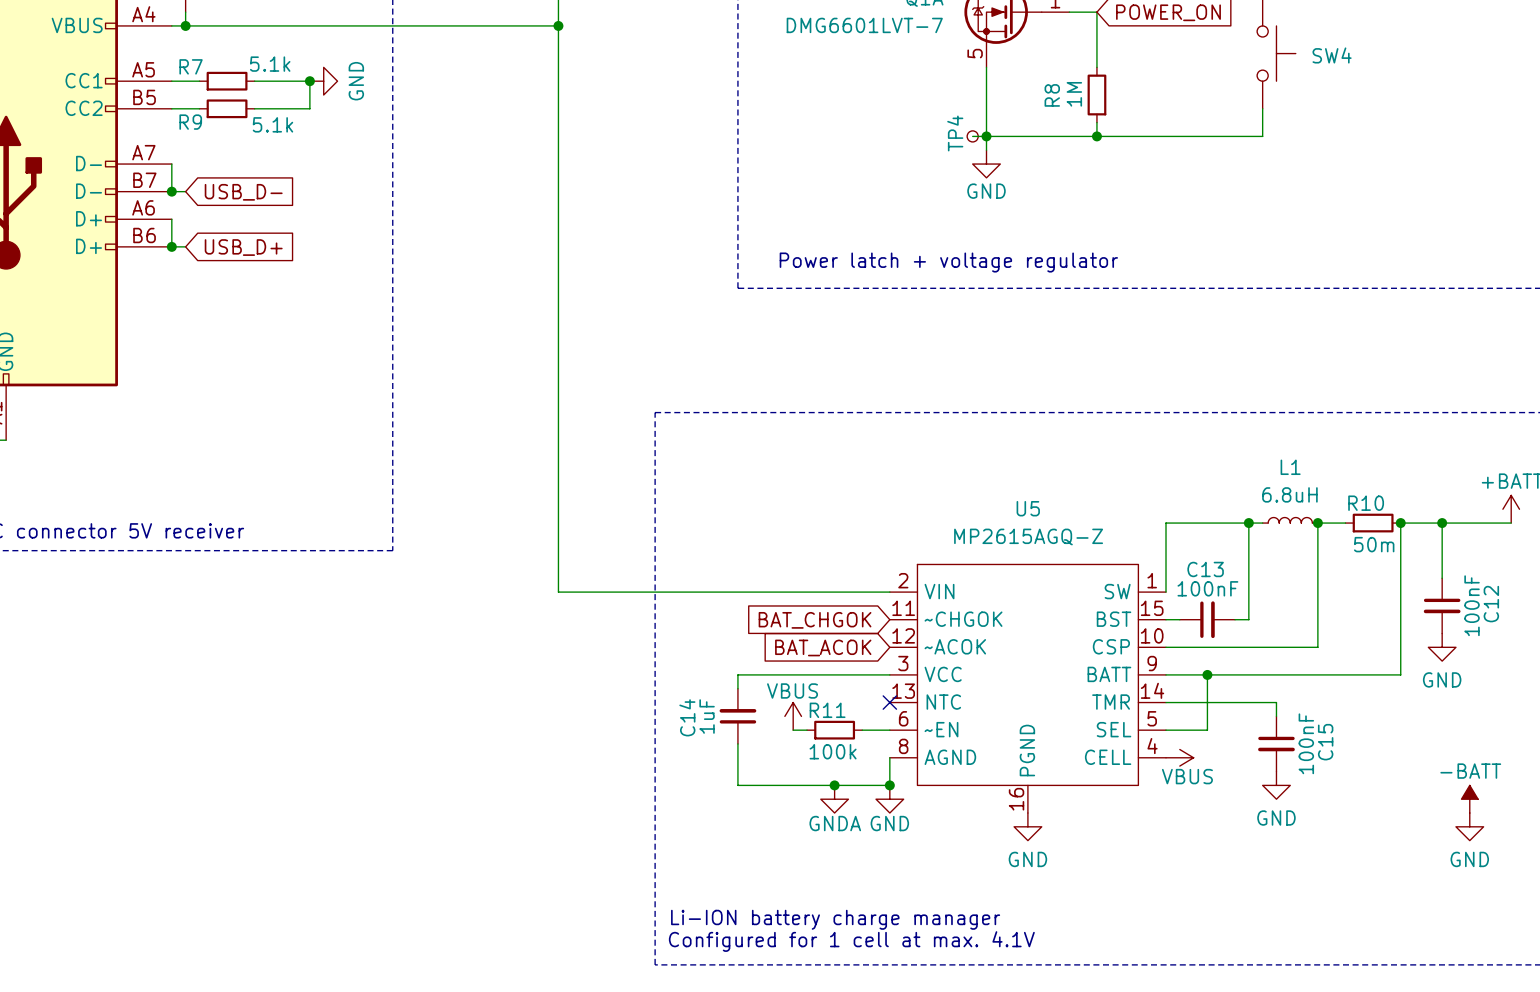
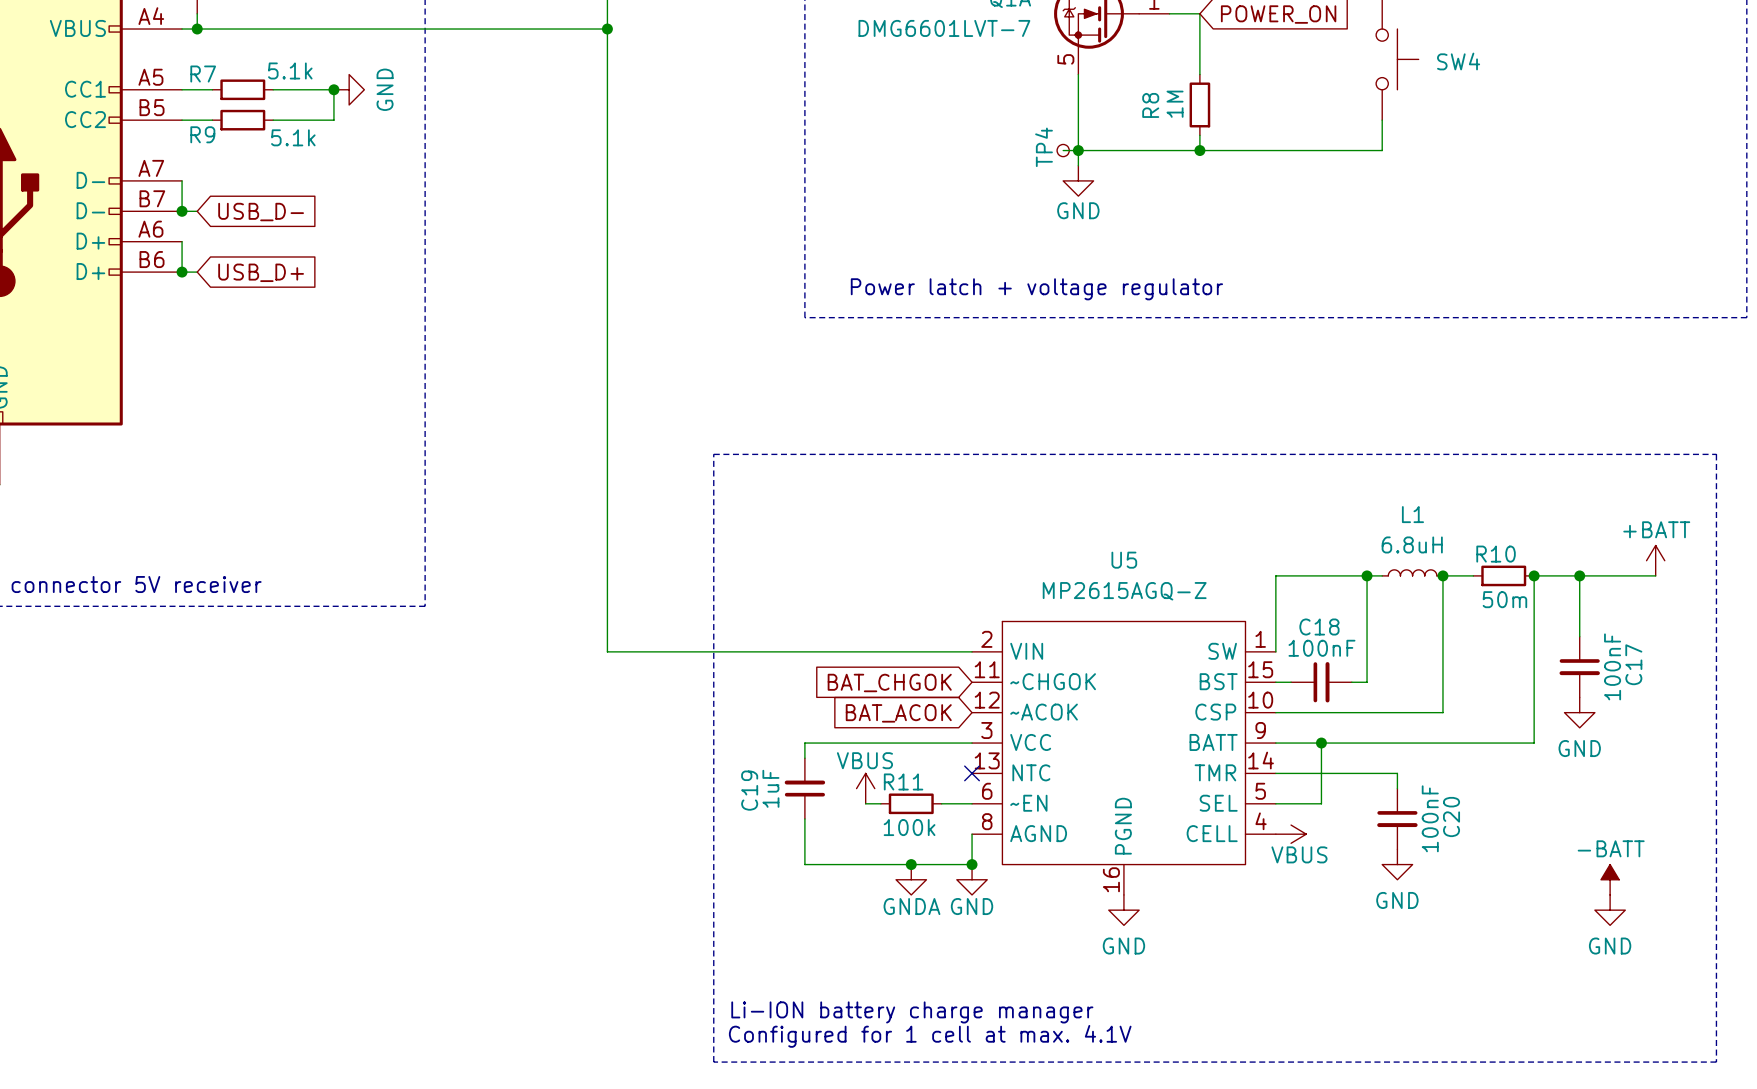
C13 name: C13 (1205, 569) -> C18 (1319, 627)
C12 name: C12 (1491, 604) -> C17 (1633, 664)
C14 name: C14 (687, 717) -> C19 (749, 790)
C15 name: C15 (1325, 742) -> C20 (1451, 817)

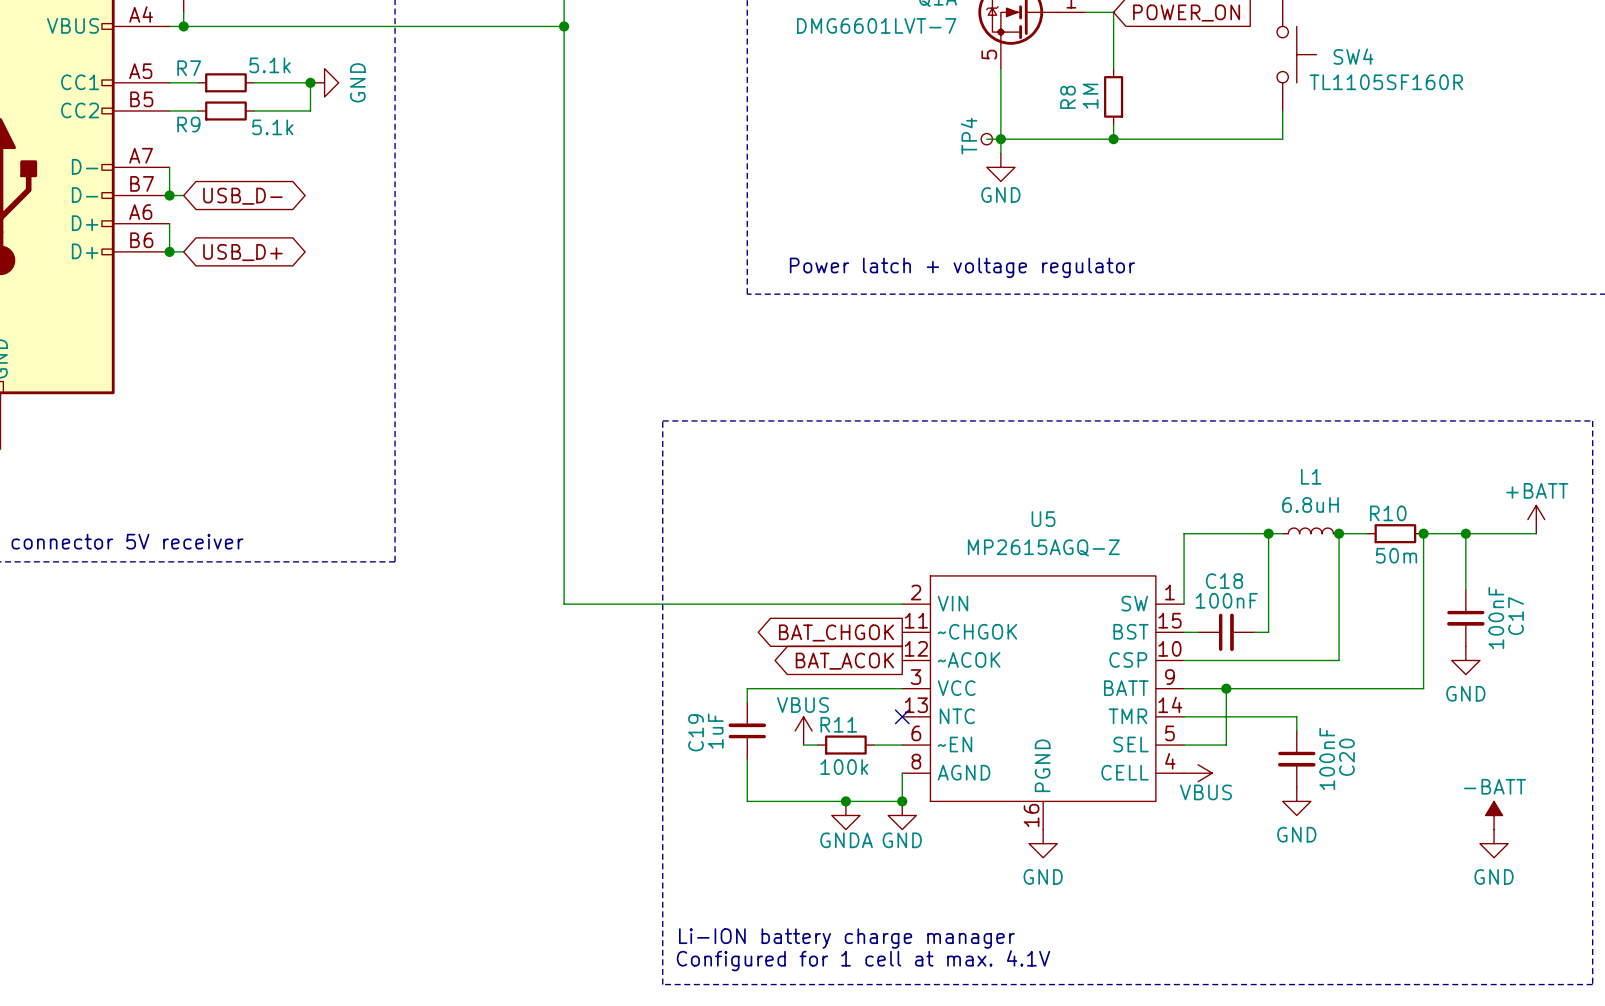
SW4 value: none -> TL1105SF160R (1386, 82)
global label shape: input (261, 212) -> bidirectional (242, 196)
global label shape: input (261, 272) -> bidirectional (242, 252)
global label shape: input (889, 682) -> output (836, 632)
global label shape: input (898, 713) -> output (844, 661)

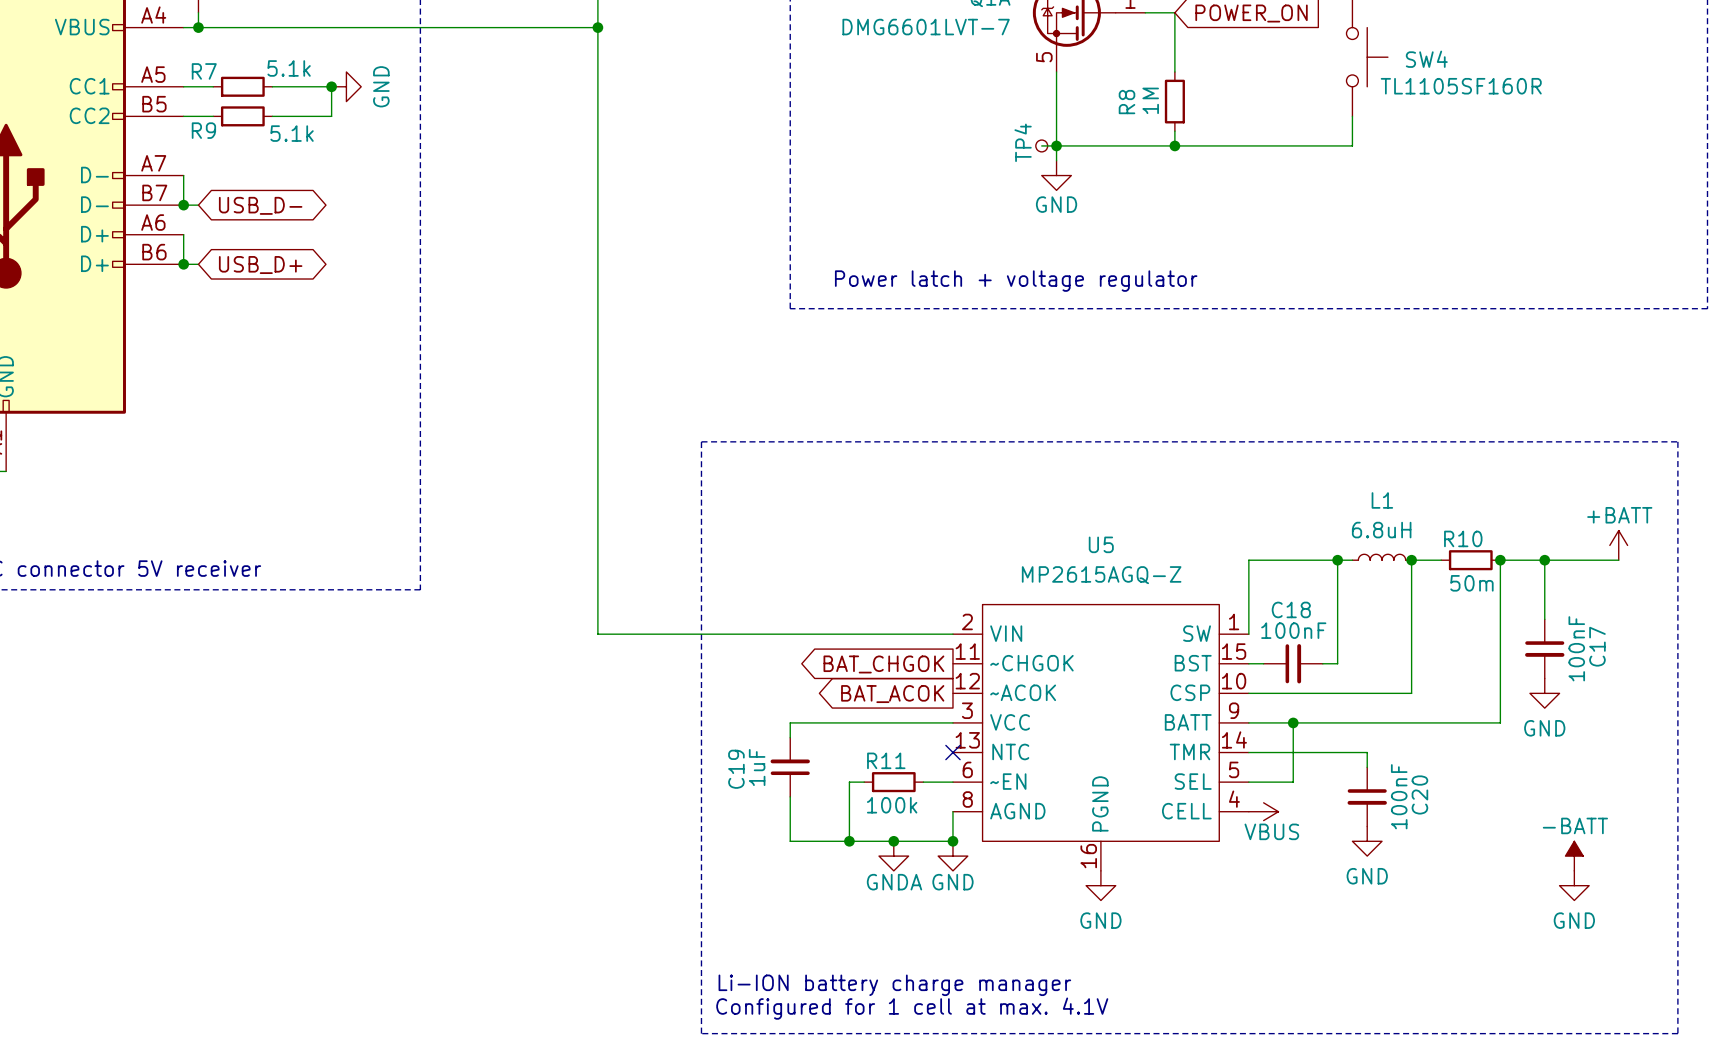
power symbol: VBUS (803, 730) -> none
wire: none -> (849, 782) (849, 841)
junction: none -> (849, 841)

